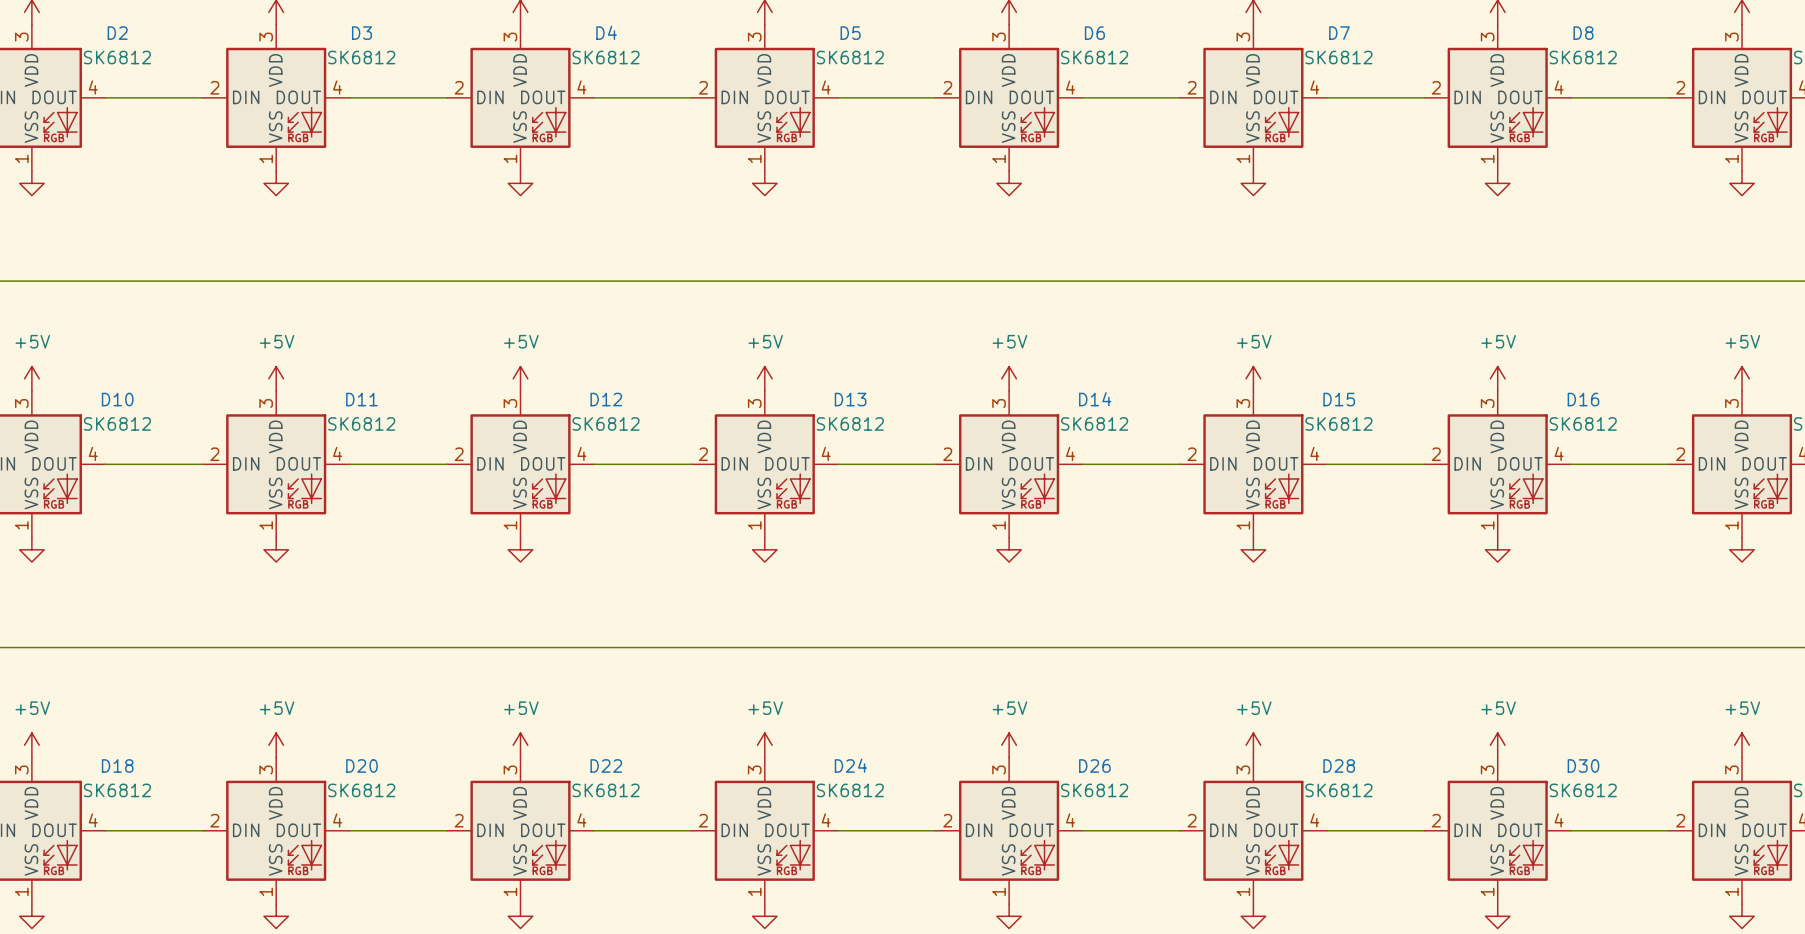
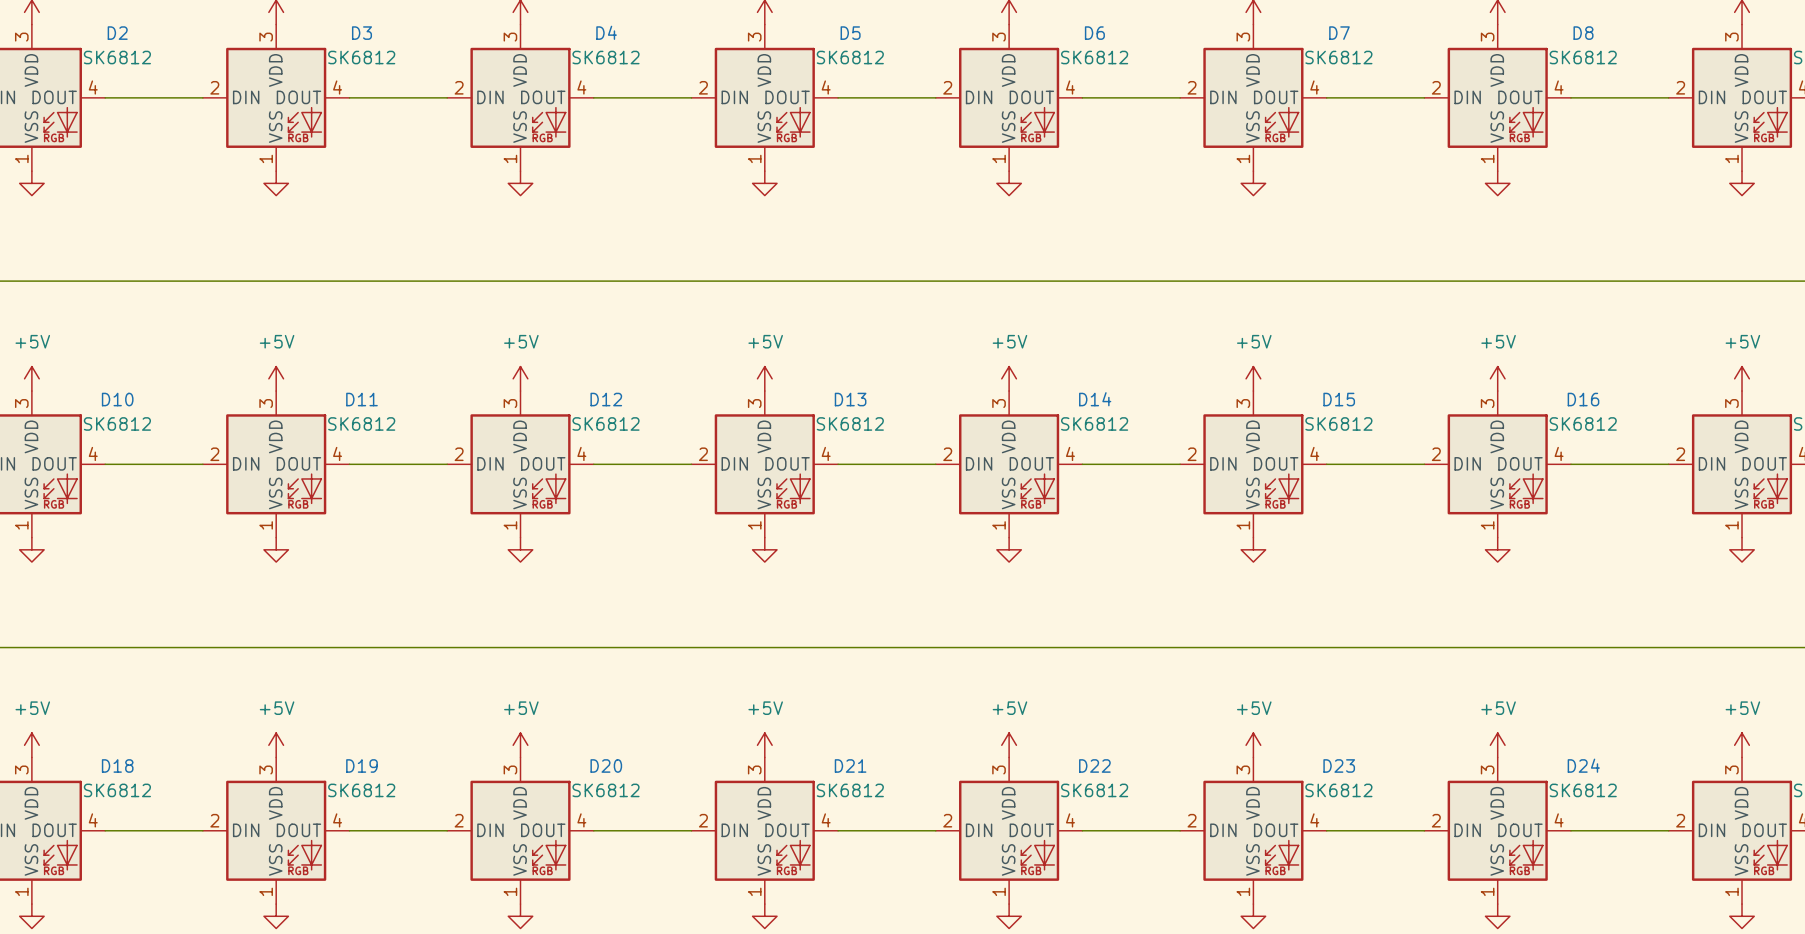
D20 name: D20 (361, 765) -> D19 (361, 765)
D22 name: D22 (606, 765) -> D20 (606, 765)
D24 name: D24 (850, 765) -> D21 (850, 765)
D26 name: D26 (1094, 765) -> D22 (1094, 765)
D28 name: D28 (1339, 765) -> D23 (1339, 765)
D30 name: D30 (1583, 765) -> D24 (1583, 765)

